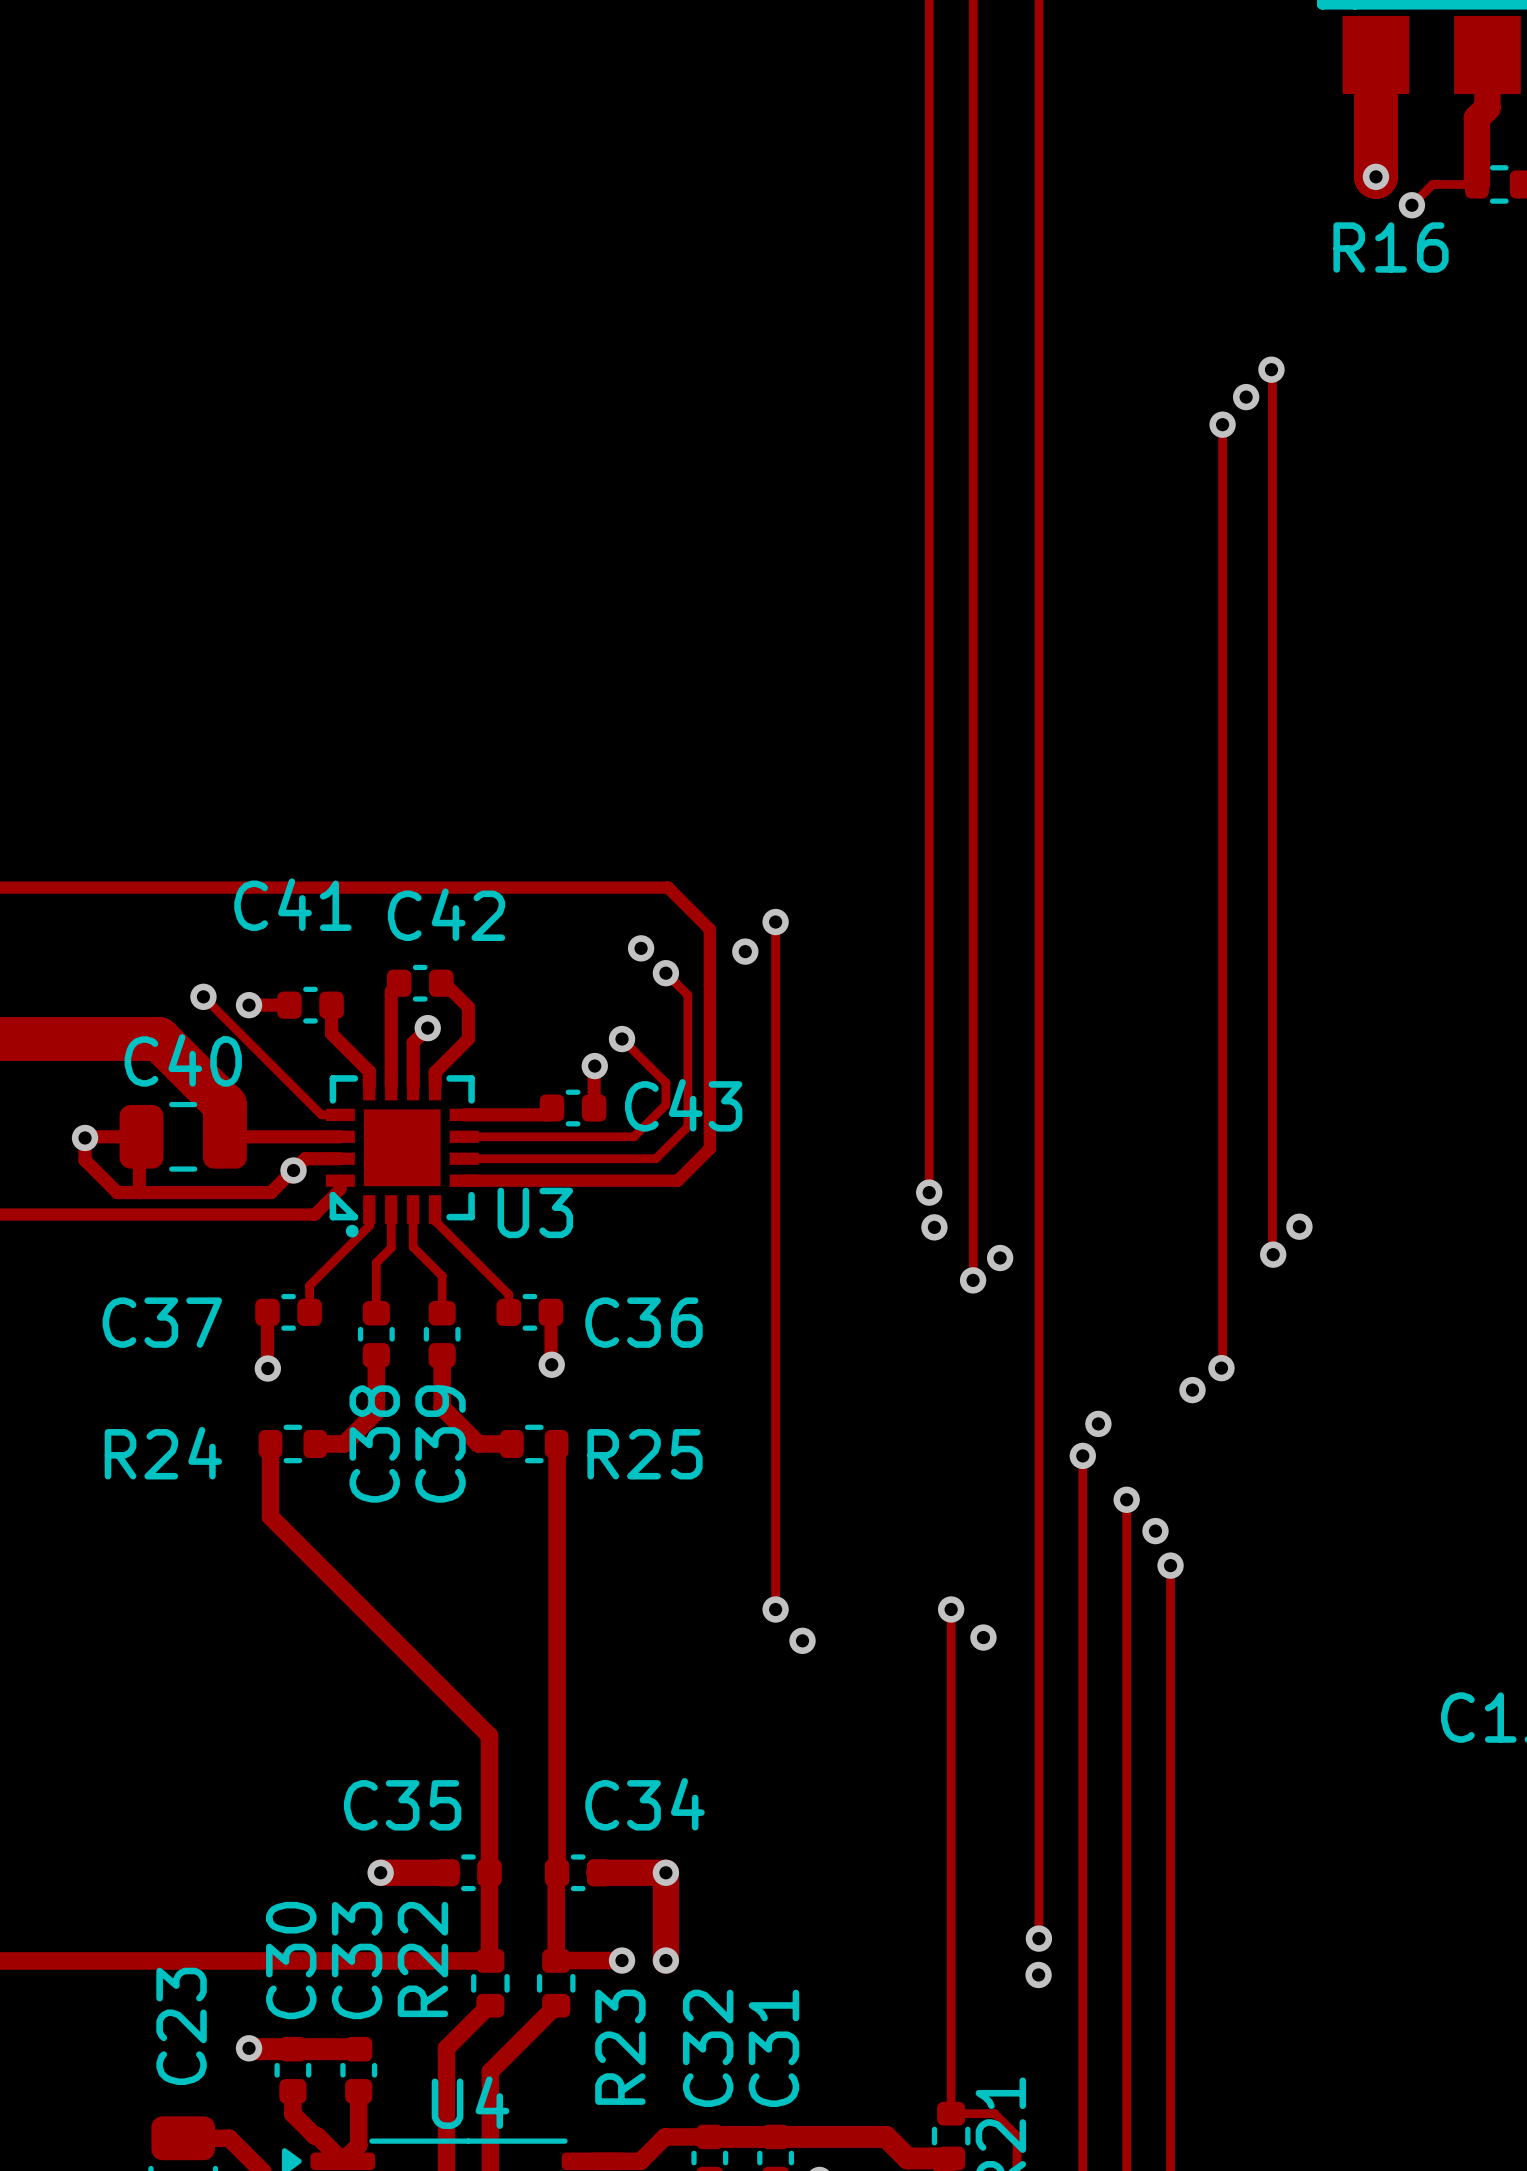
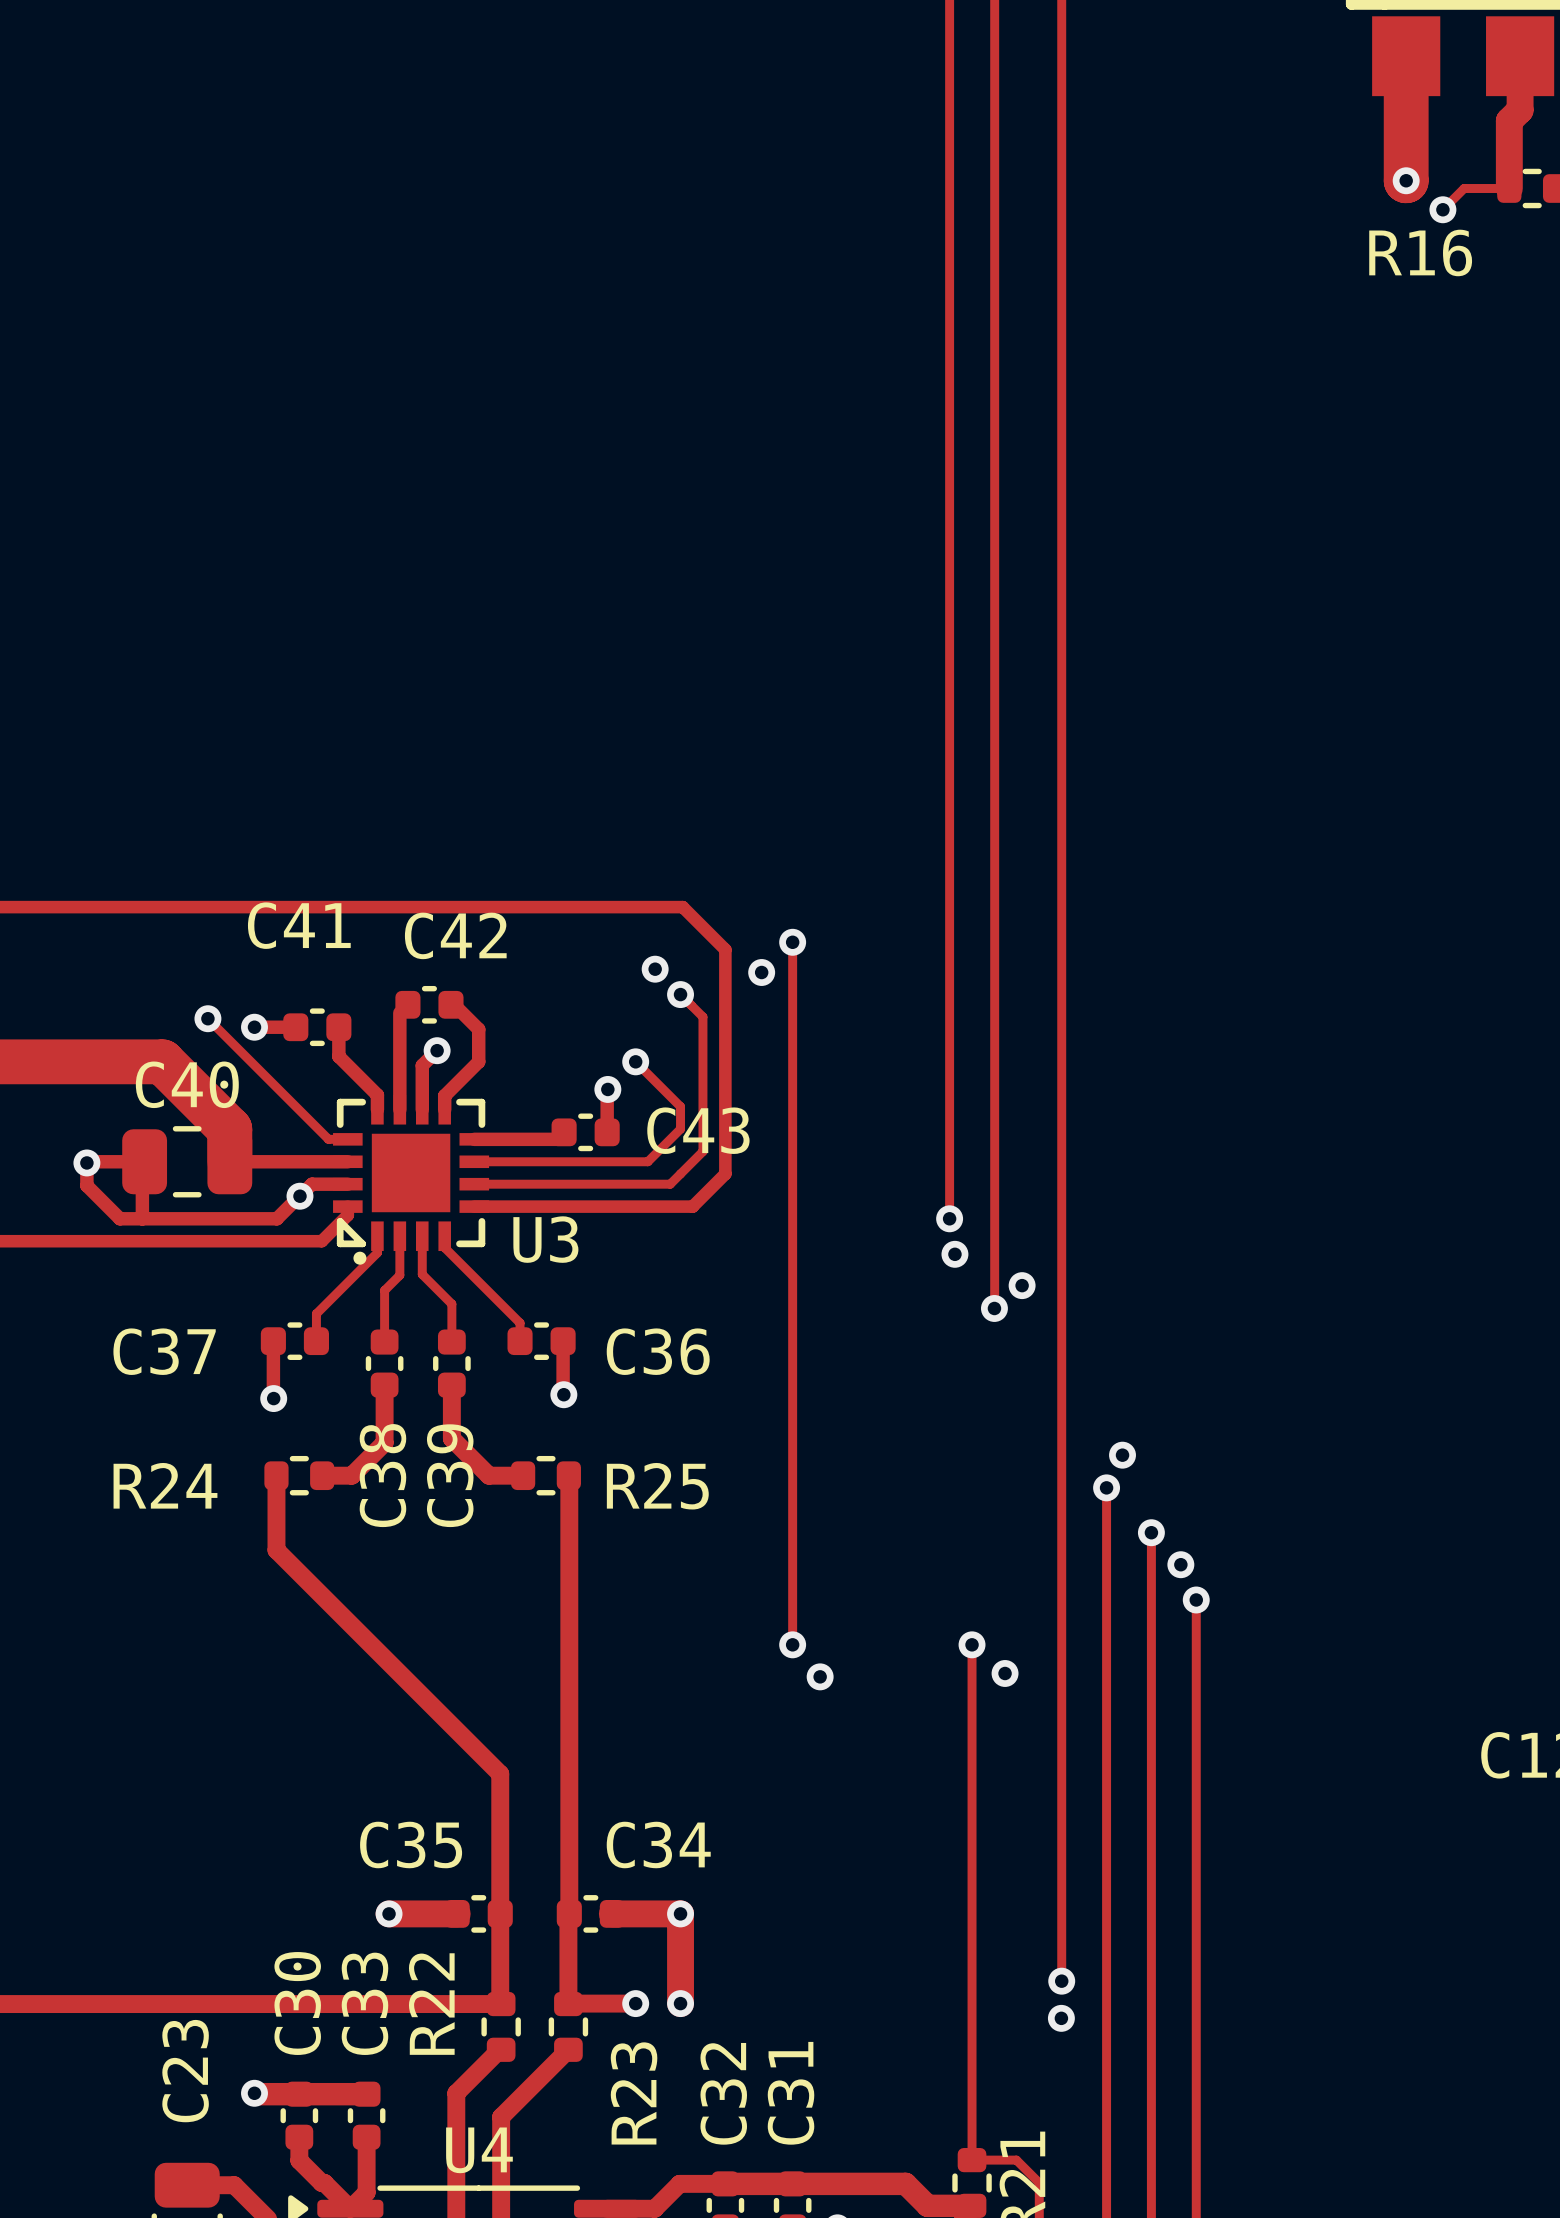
track: (1271, 369) (1273, 1254) -> none
via: (1271, 369) -> none
via: (1246, 397) -> none
track: (1222, 424) (1221, 1368) -> none
via: (1222, 424) -> none
via: (1299, 1226) -> none
via: (1273, 1254) -> none
via: (1221, 1368) -> none
via: (1192, 1390) -> none

